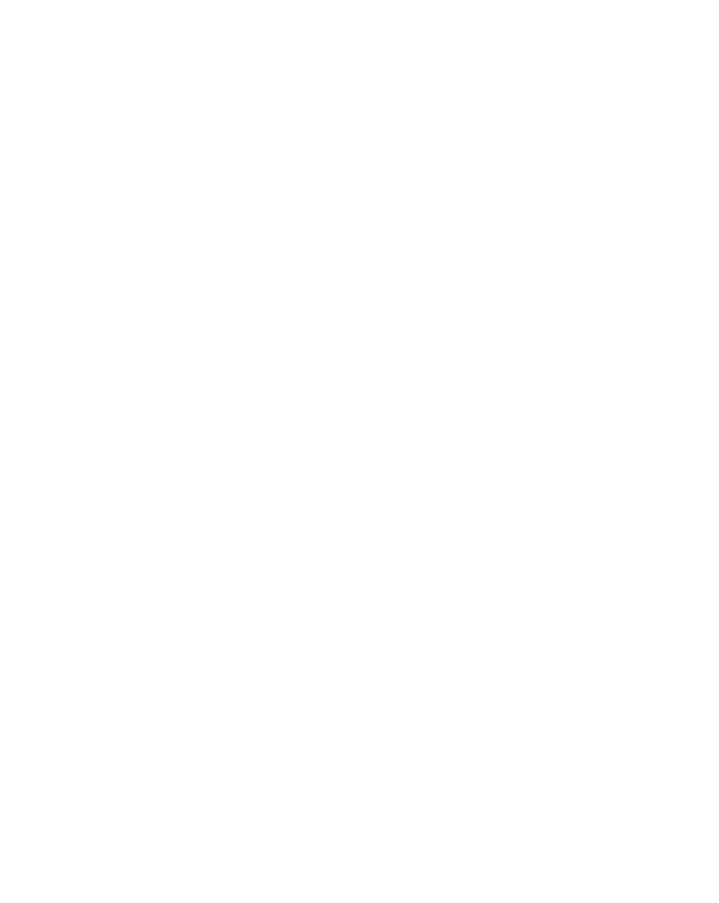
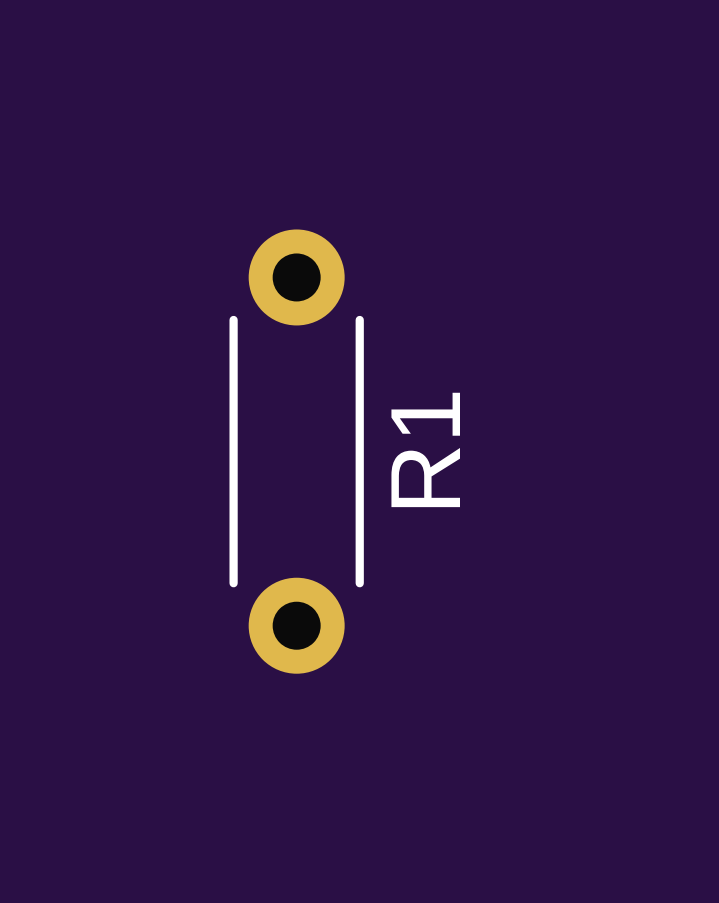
R1: none -> (296, 451)

